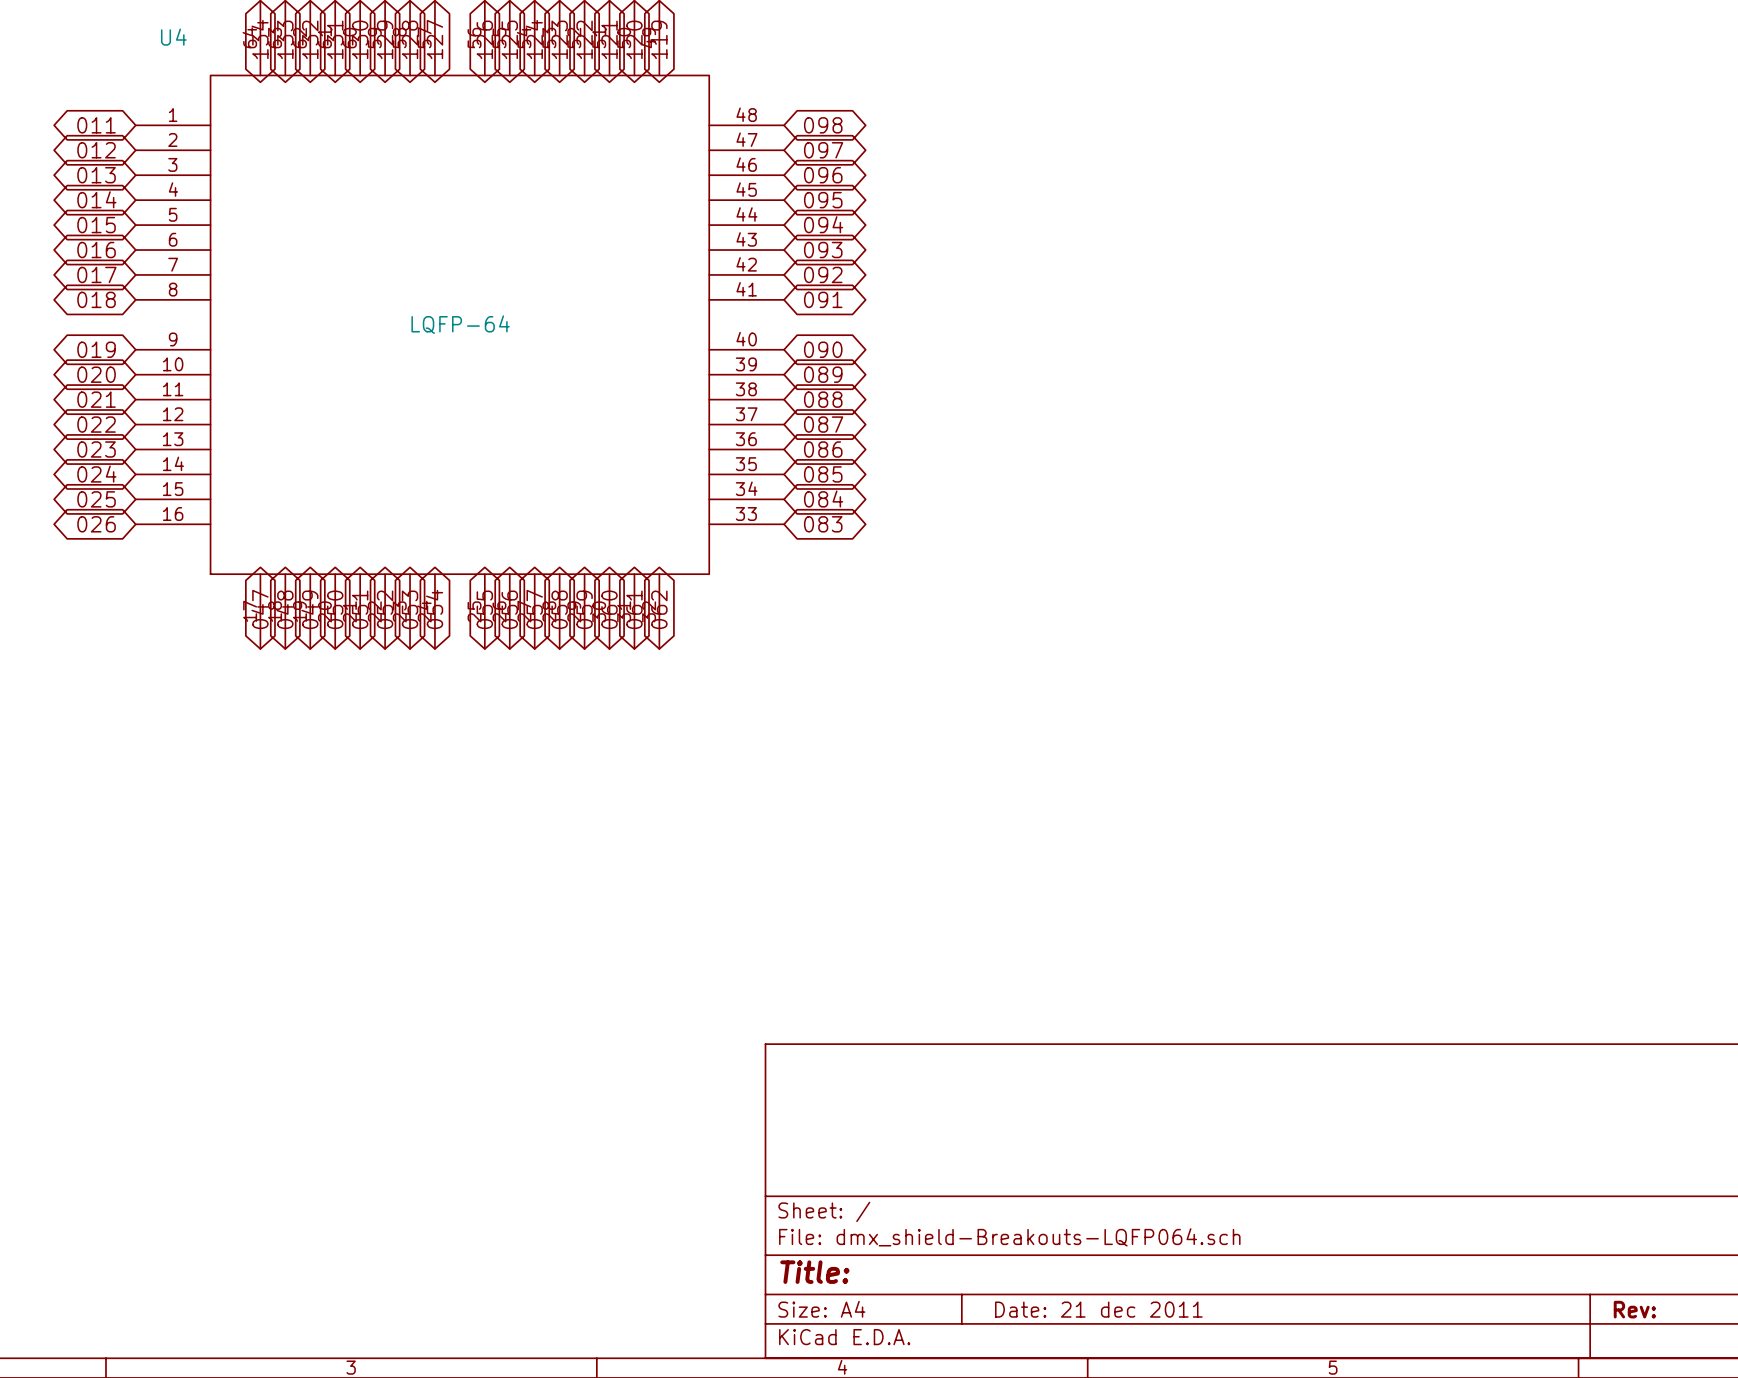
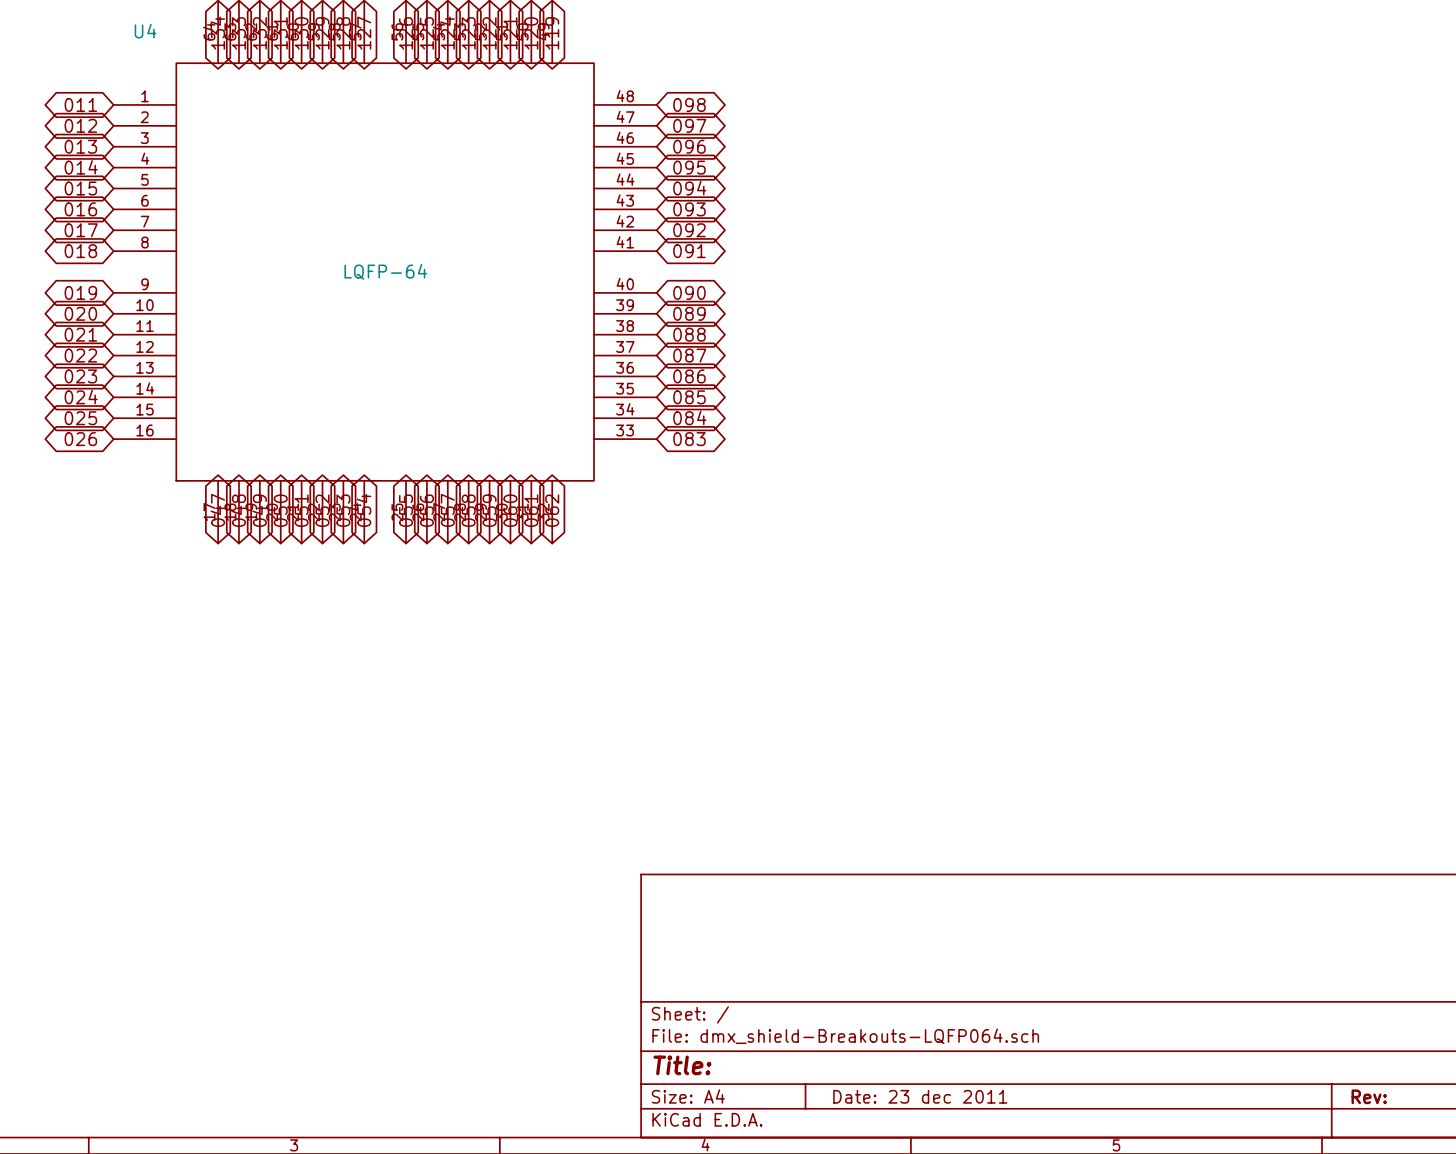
title block: Date: 21 dec 2011 (1098, 1309) -> Date: 23 dec 2011 (920, 1096)

